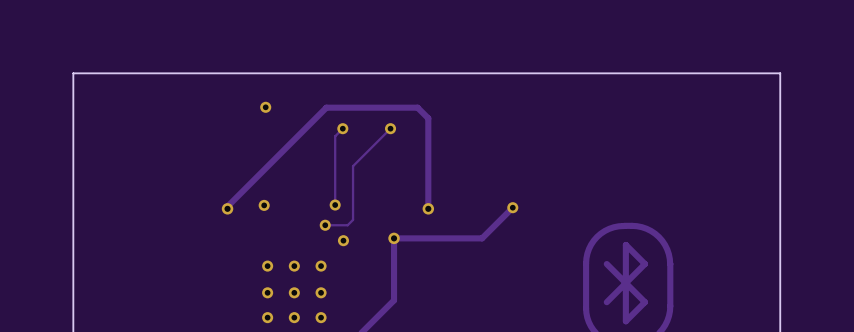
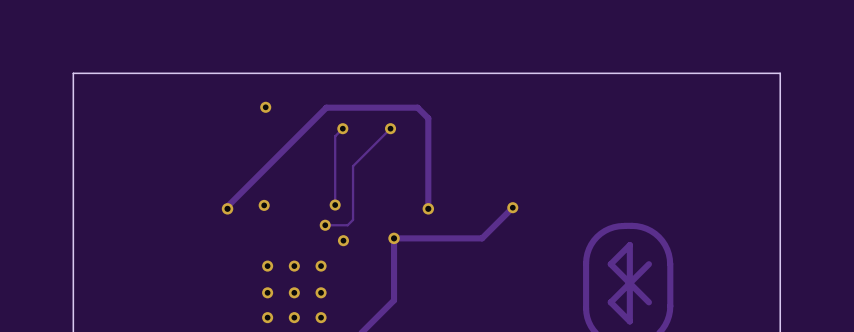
track: (606, 264) (644, 302) (625, 321) (625, 244) (644, 264) (606, 302) -> none
track: none -> (648, 264) (610, 302) (629, 321) (629, 245) (610, 264) (648, 302)

